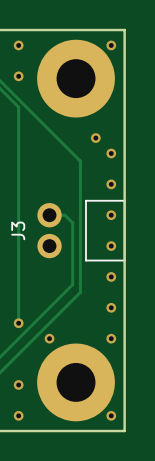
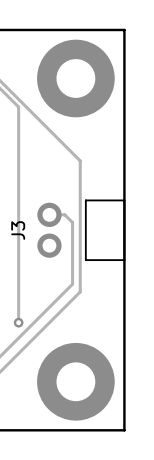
via: (18, 45) -> none
via: (111, 45) -> none
via: (18, 76) -> none
via: (95, 138) -> none
via: (111, 153) -> none
via: (111, 184) -> none
via: (111, 215) -> none
via: (111, 246) -> none
via: (111, 276) -> none
via: (111, 307) -> none
via: (49, 338) -> none
via: (111, 338) -> none
via: (18, 384) -> none
via: (18, 415) -> none
via: (111, 415) -> none

